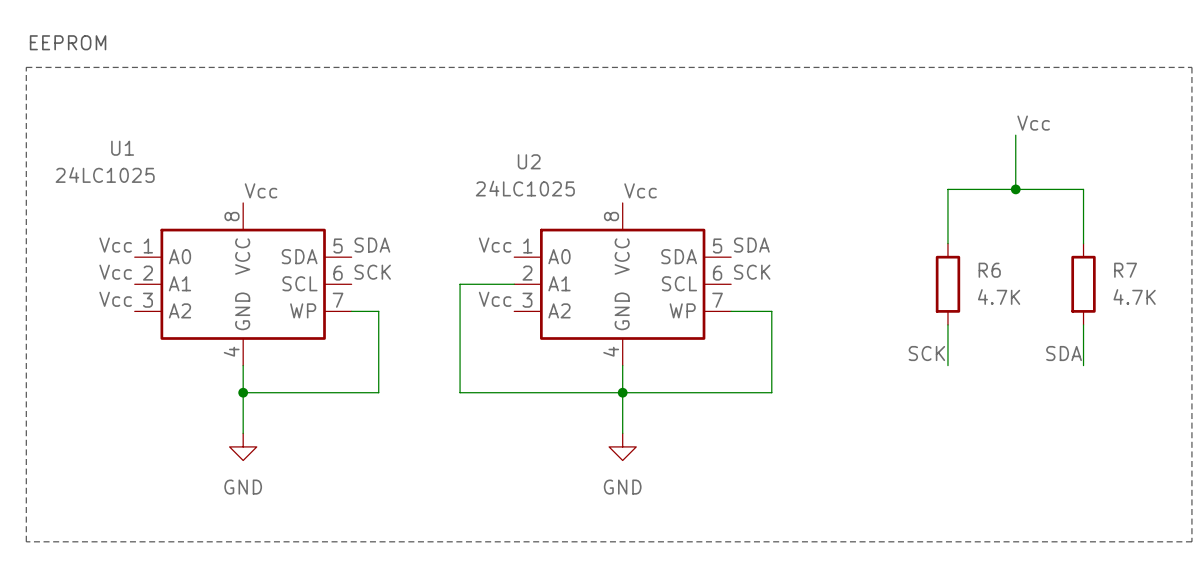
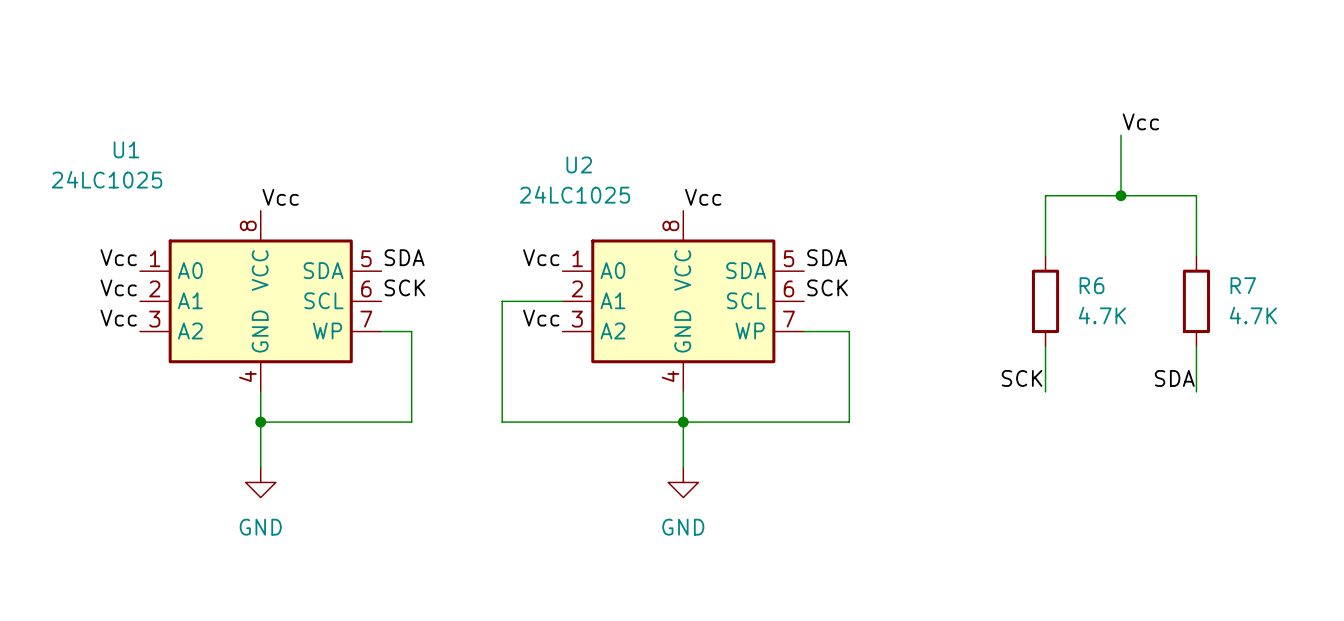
text: EEPROM (68, 42) -> none
line: (26, 67) (1191, 67) (1191, 541) (26, 541) (26, 67) -> none

